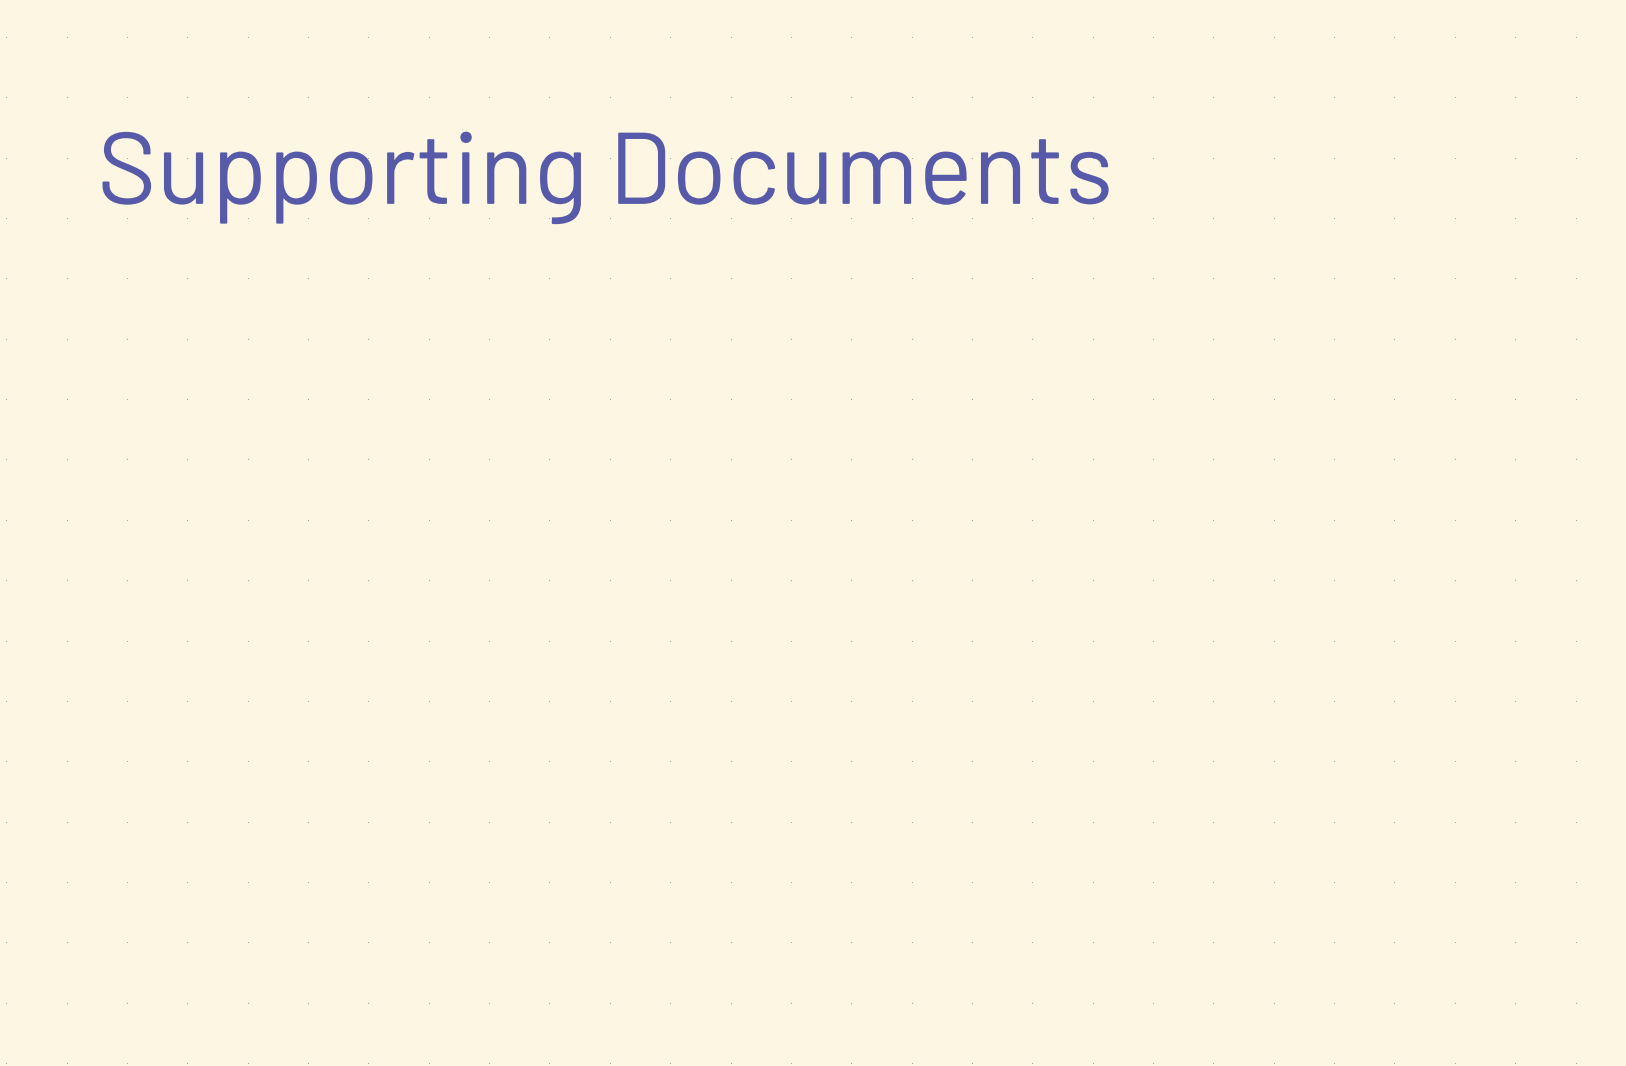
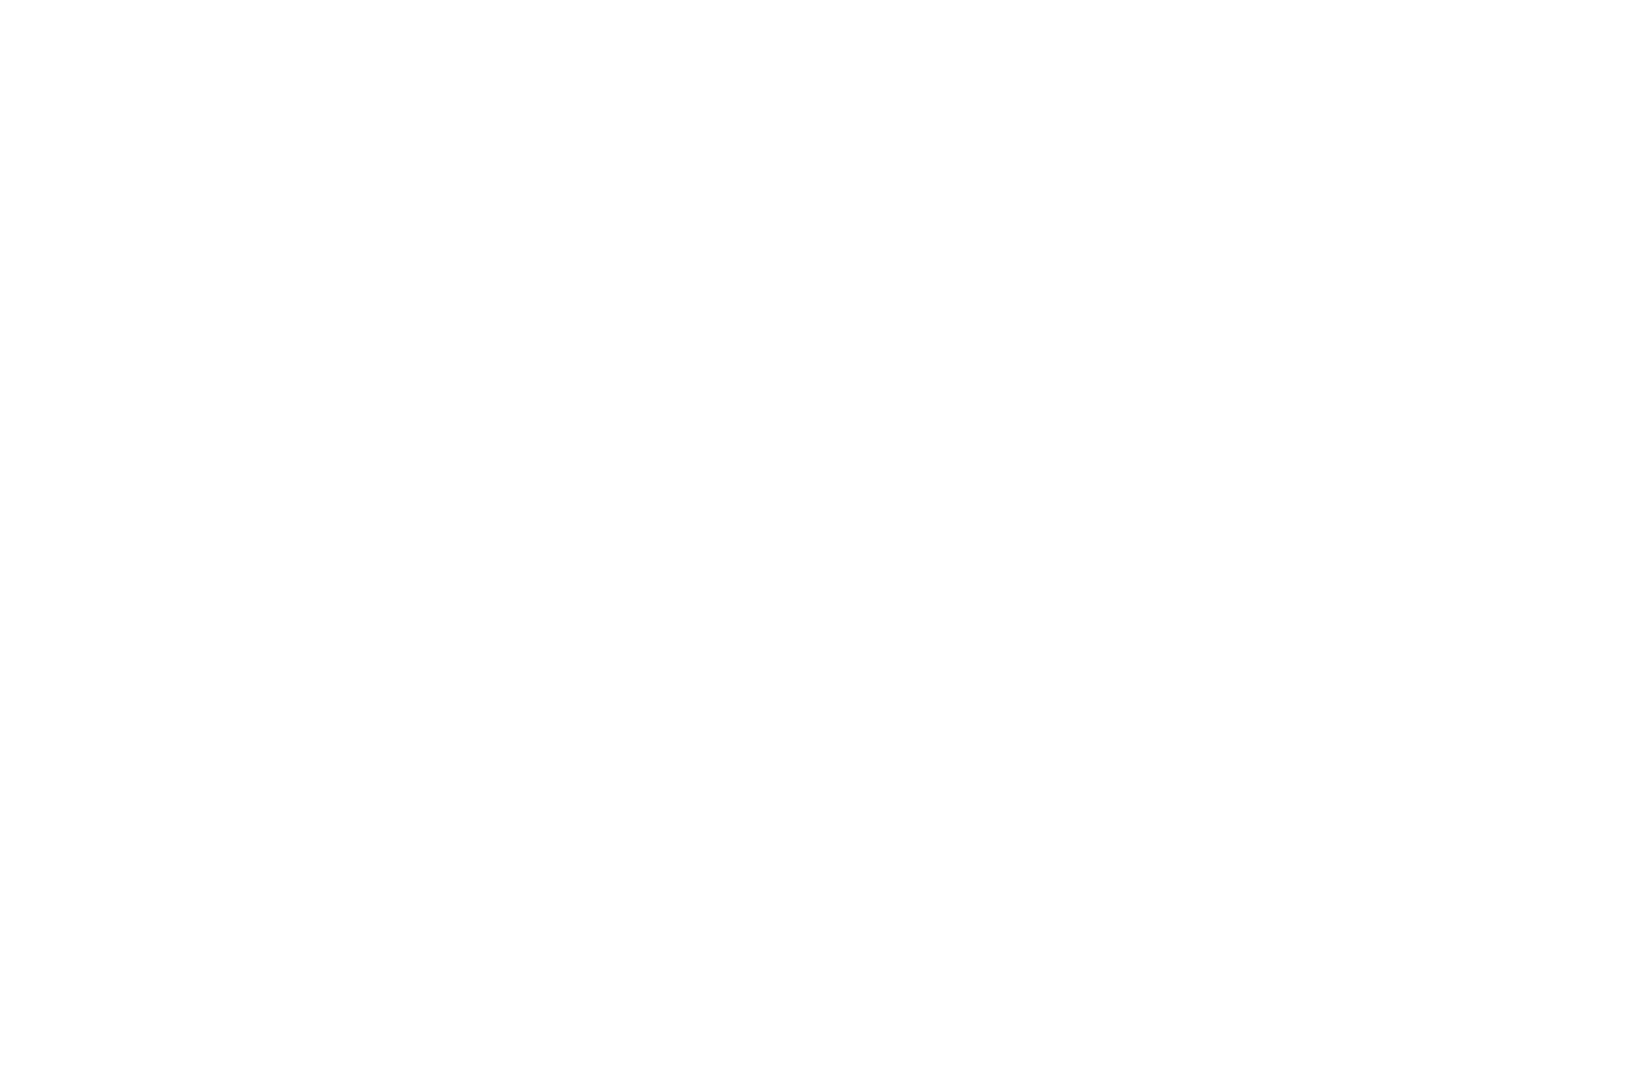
text: Supporting Documents (605, 177) -> none

